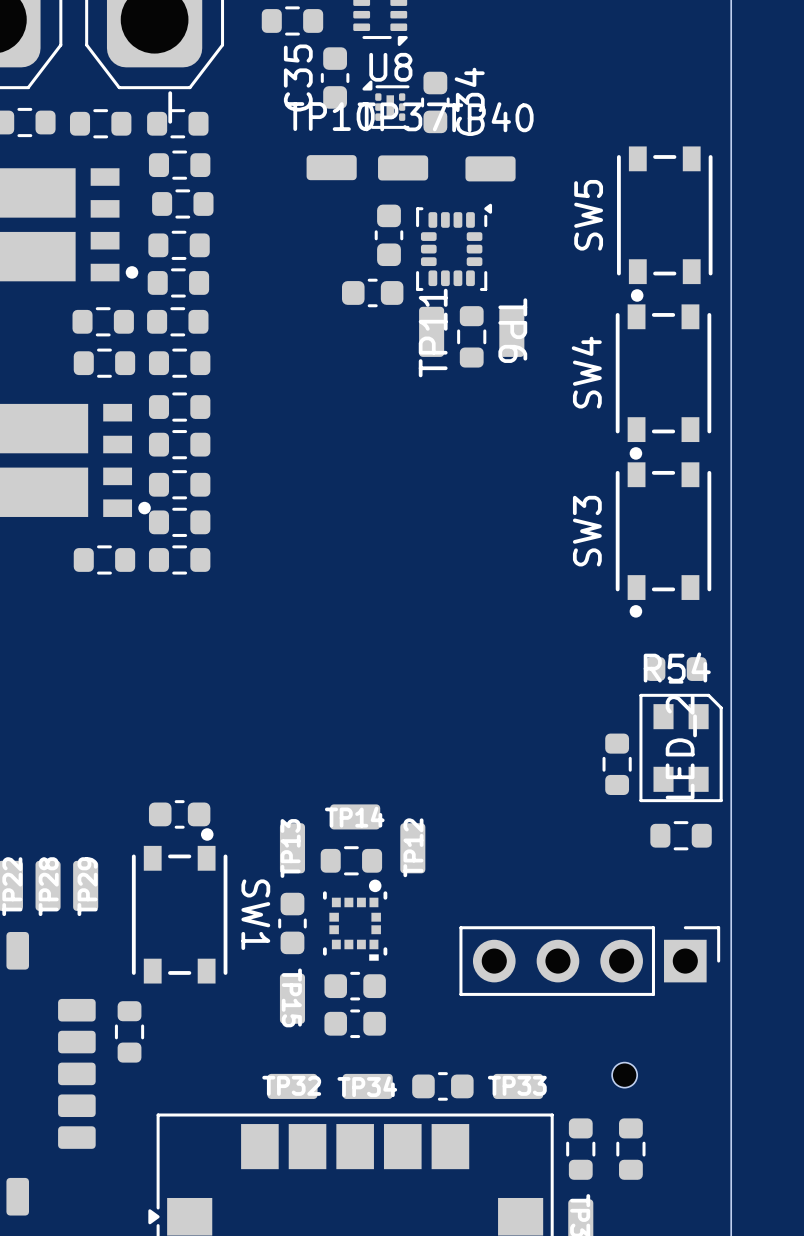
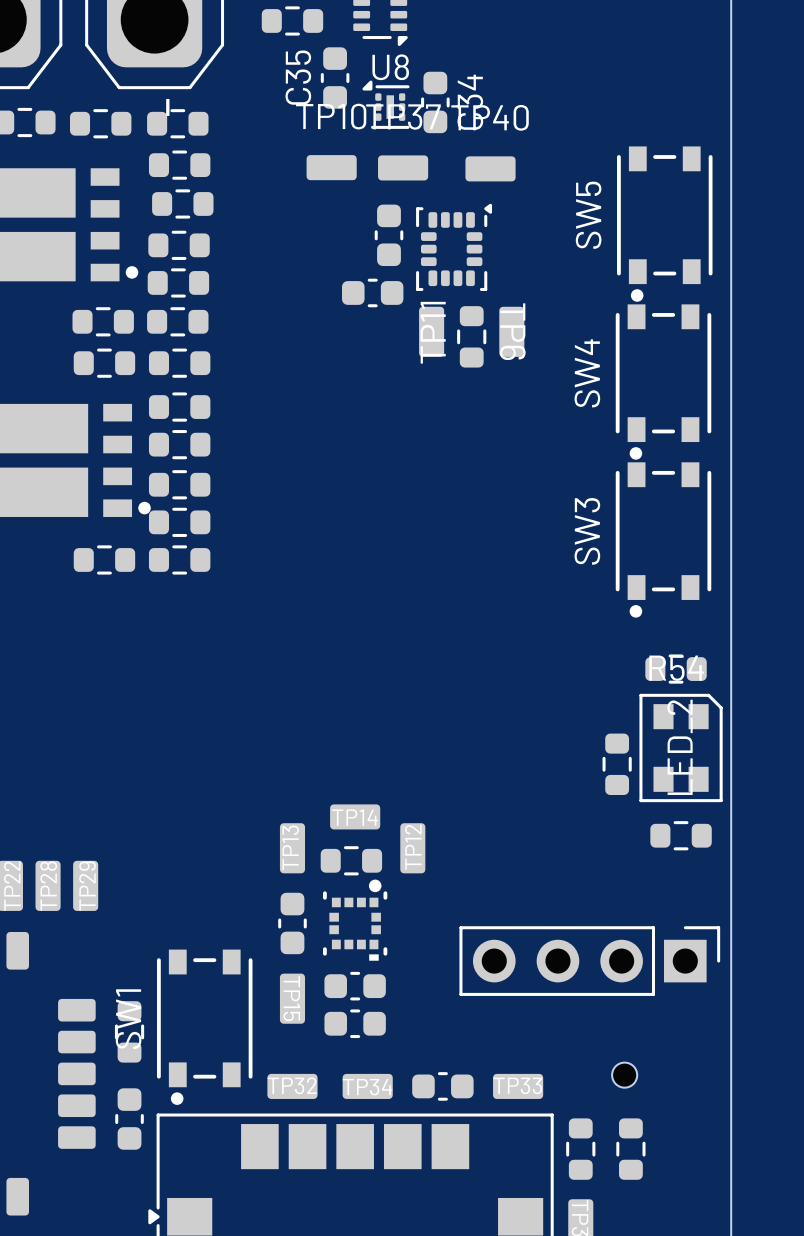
part rotation: 0° (179, 814) -> 90° clockwise (129, 1119)
part position: (179, 814) -> (129, 1119)
SW1 rotation: 0° (179, 905) -> 180° (204, 1027)
SW1 position: (179, 905) -> (204, 1027)

